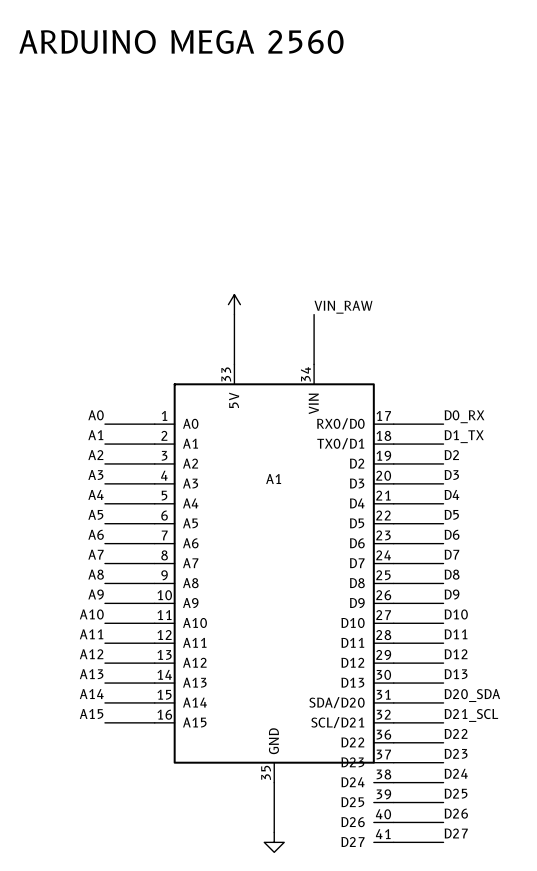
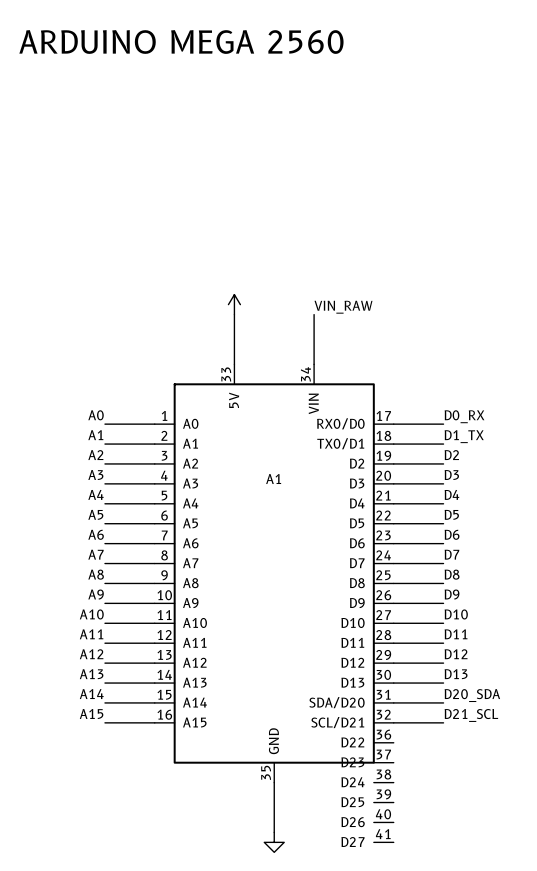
label: D22 (456, 733) -> none
wire: (393, 742) (443, 742) -> none
label: D23 (456, 753) -> none
wire: (393, 762) (443, 762) -> none
label: D24 (456, 773) -> none
wire: (393, 782) (443, 782) -> none
label: D25 (456, 793) -> none
wire: (393, 802) (443, 802) -> none
label: D26 (456, 813) -> none
wire: (393, 822) (443, 822) -> none
label: D27 (456, 833) -> none
wire: (393, 842) (443, 842) -> none

